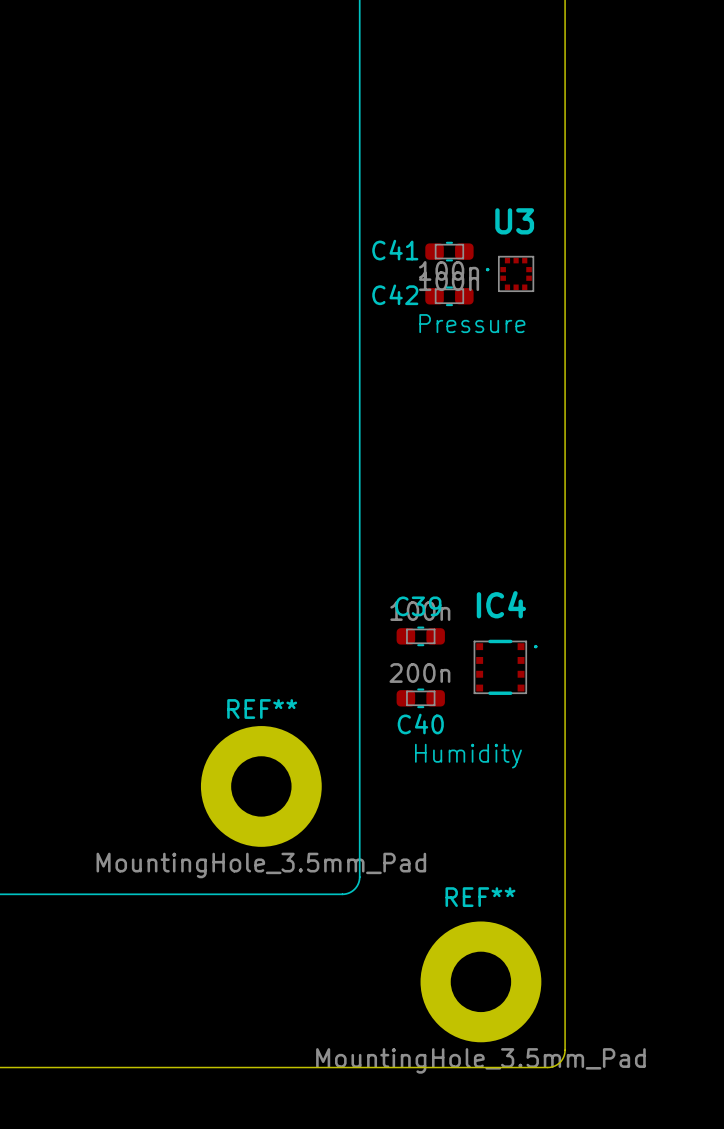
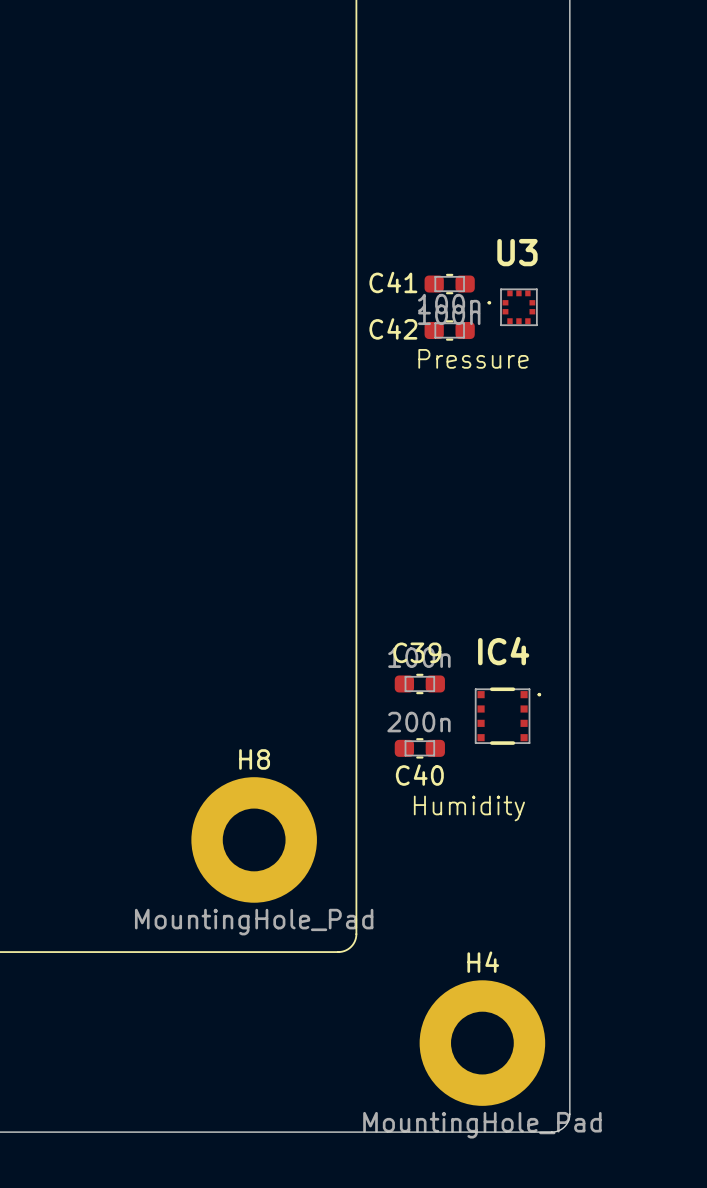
REF** name: REF** (262, 709) -> H8 (254, 759)
REF** value: MountingHole_3.5mm_Pad (261, 865) -> MountingHole_Pad (254, 922)
REF** name: REF** (480, 897) -> H4 (483, 962)
REF** value: MountingHole_3.5mm_Pad (480, 1060) -> MountingHole_Pad (482, 1125)

